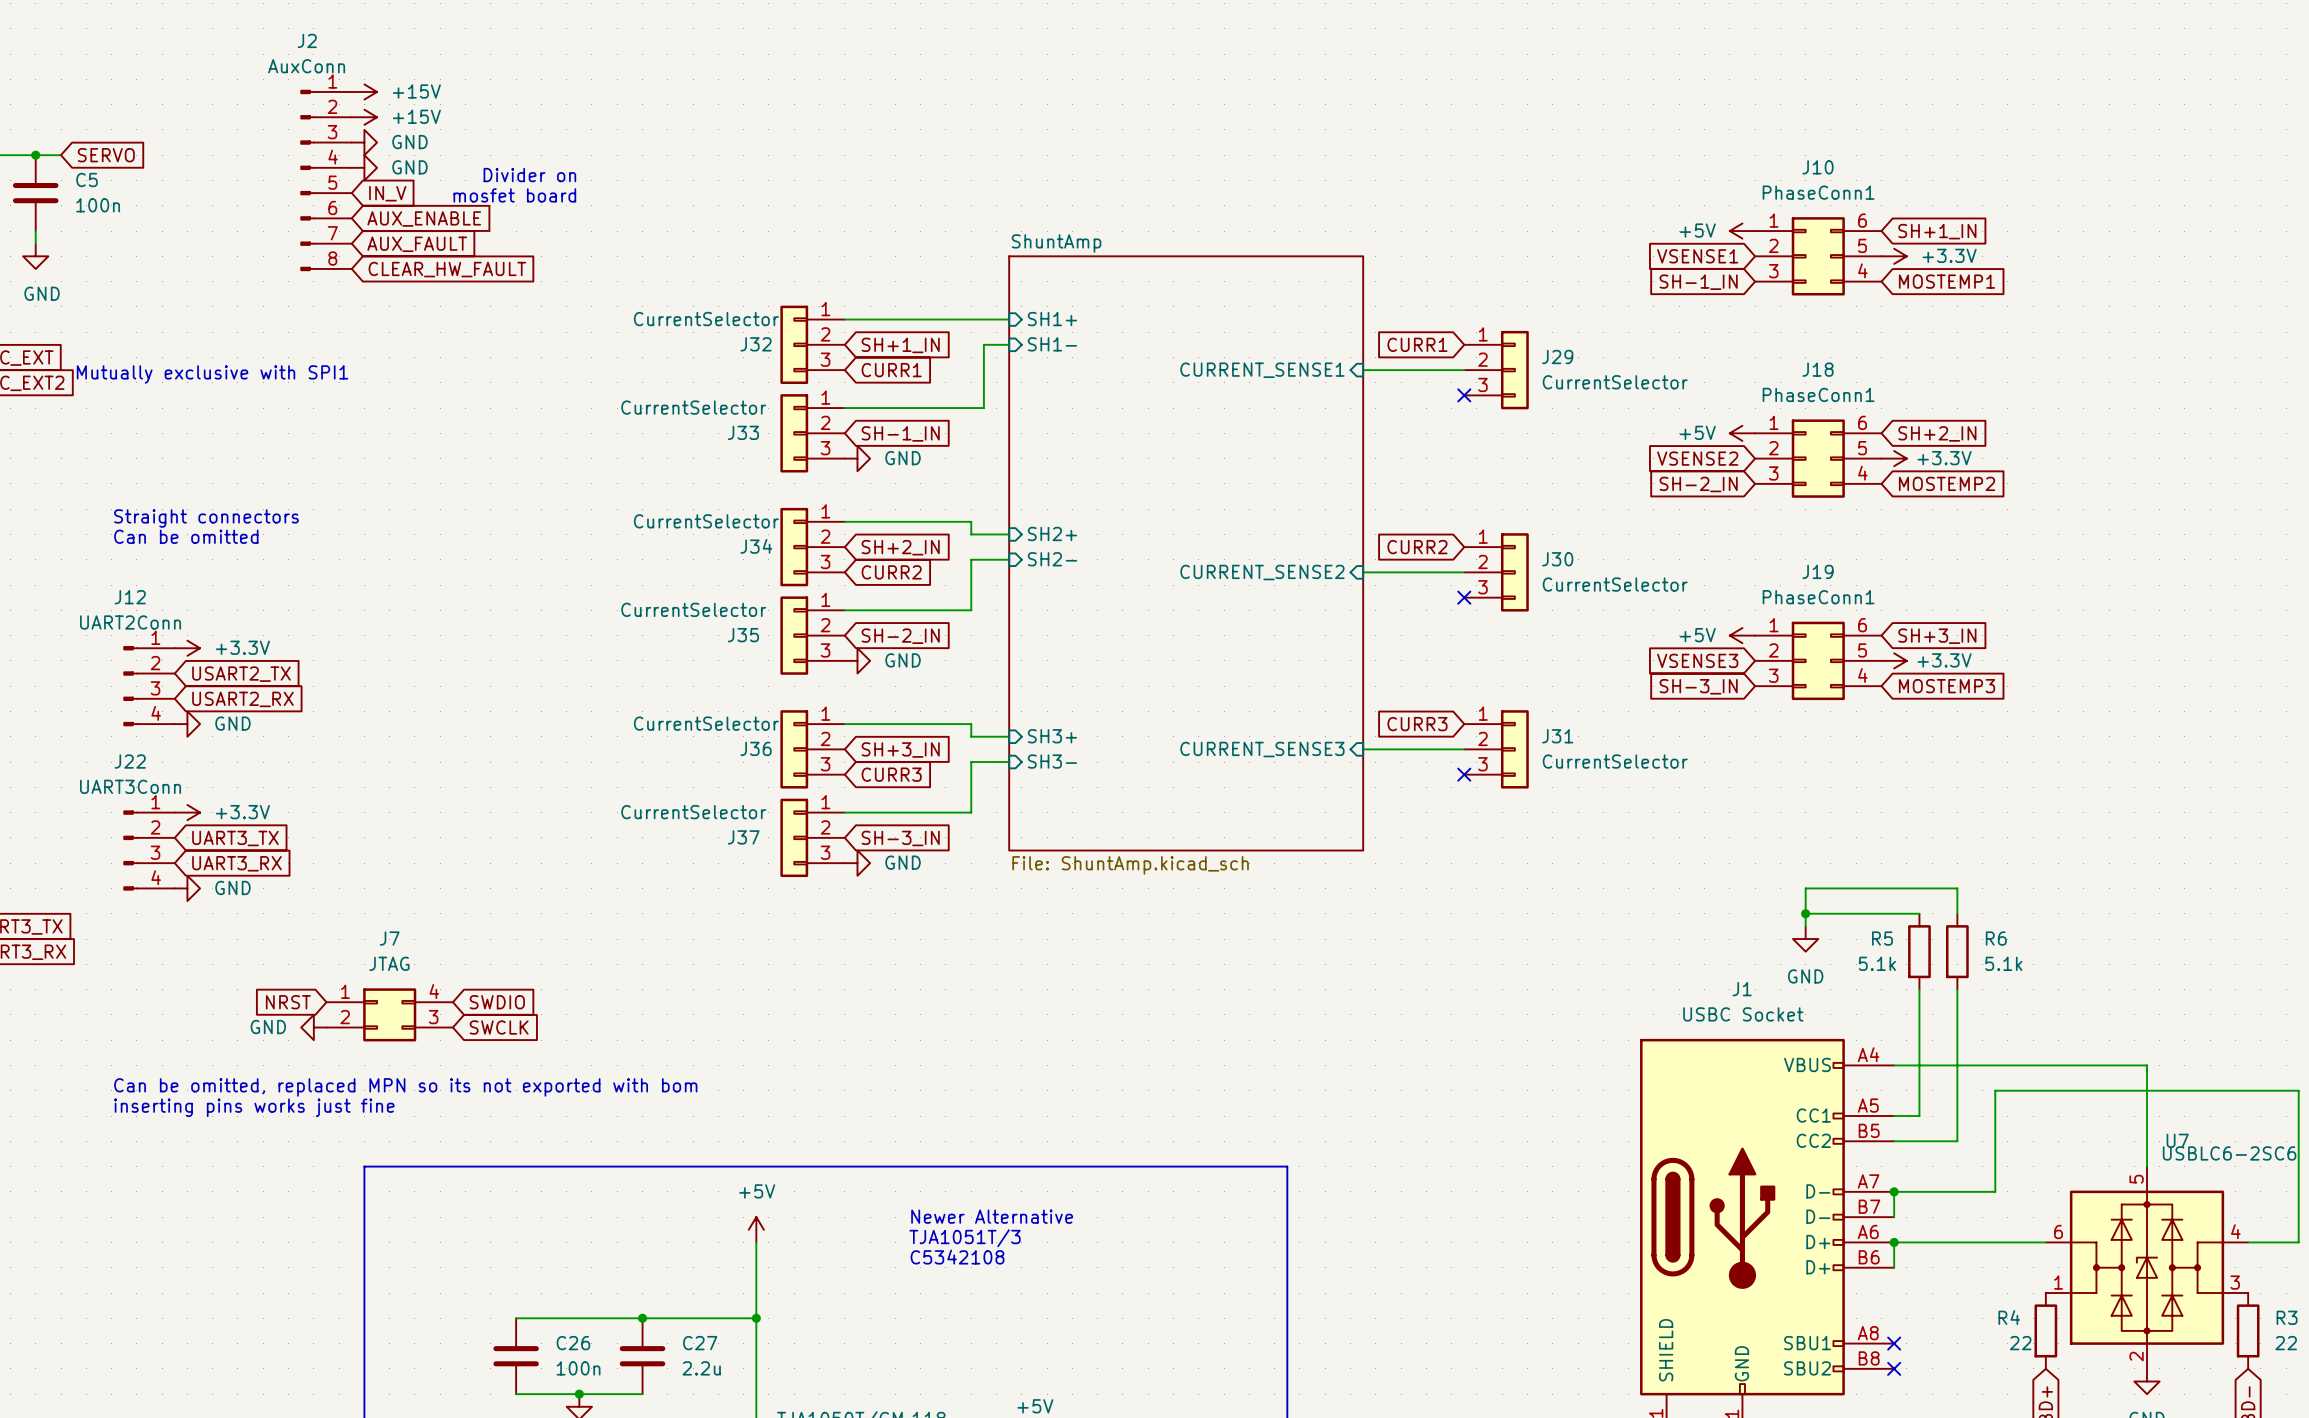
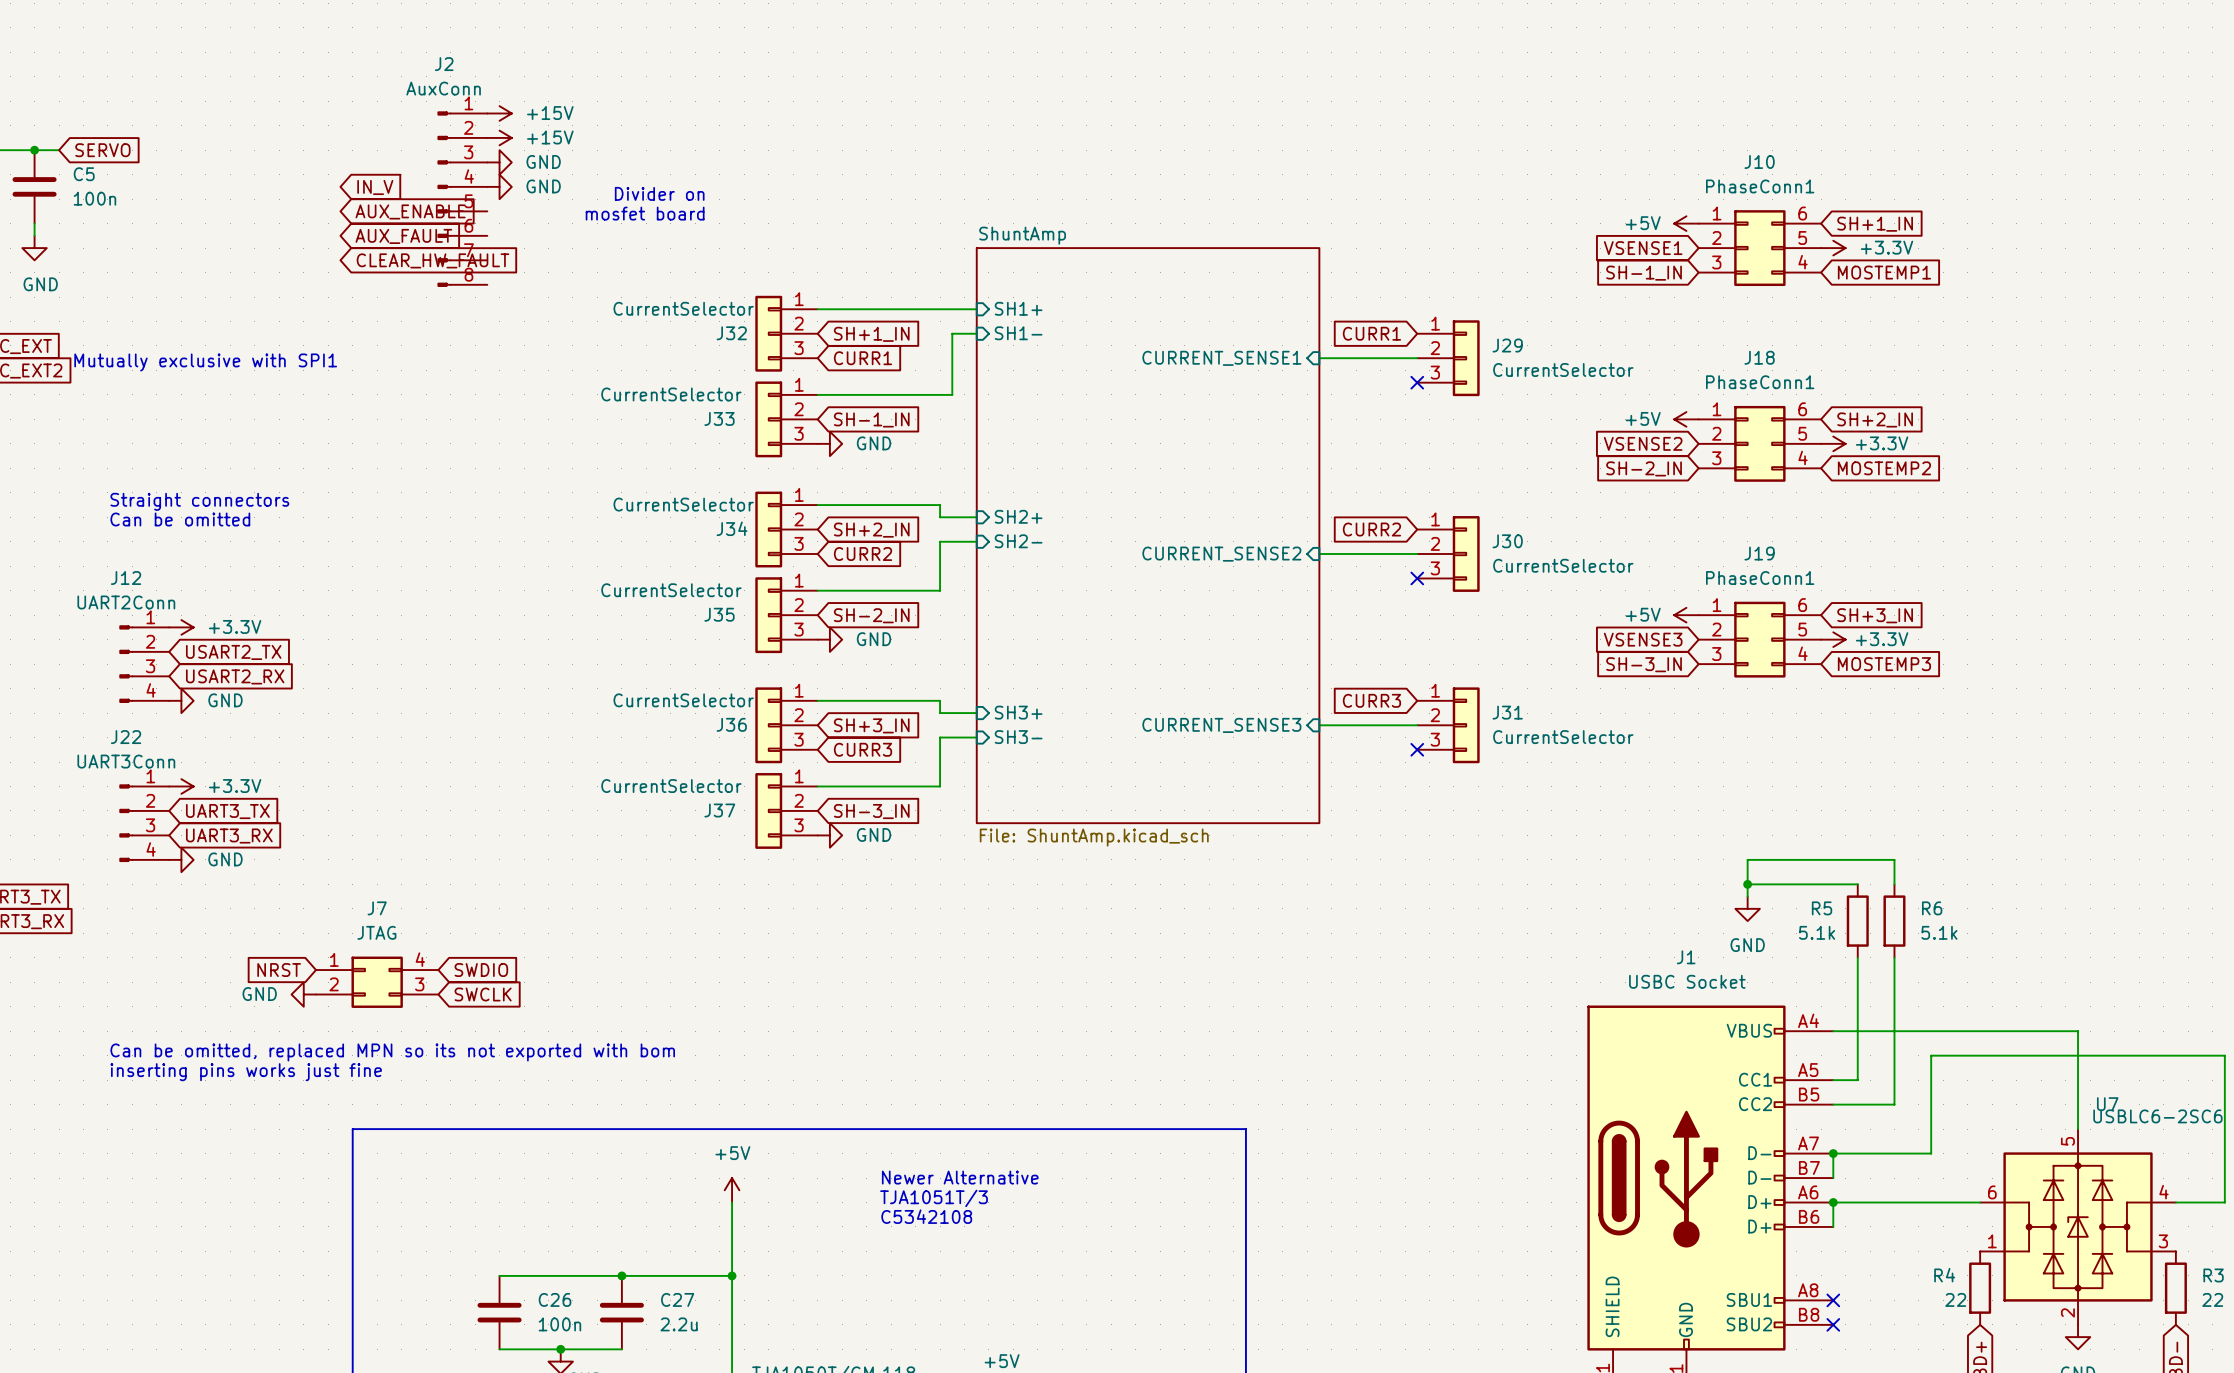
power symbol: +15V (364, 91) -> none
power symbol: +15V (364, 117) -> none
power symbol: none -> +15V (499, 113)
power symbol: GND (364, 142) -> none
power symbol: none -> +15V (499, 137)
power symbol: GND (364, 167) -> none
power symbol: none -> GND (499, 162)
text position: Divider on (529, 175) -> Divider on (659, 193)
J2 position: (326, 180) -> (462, 199)
power symbol: none -> GND (499, 186)
text position: mosfet board (514, 195) -> mosfet board (645, 213)

